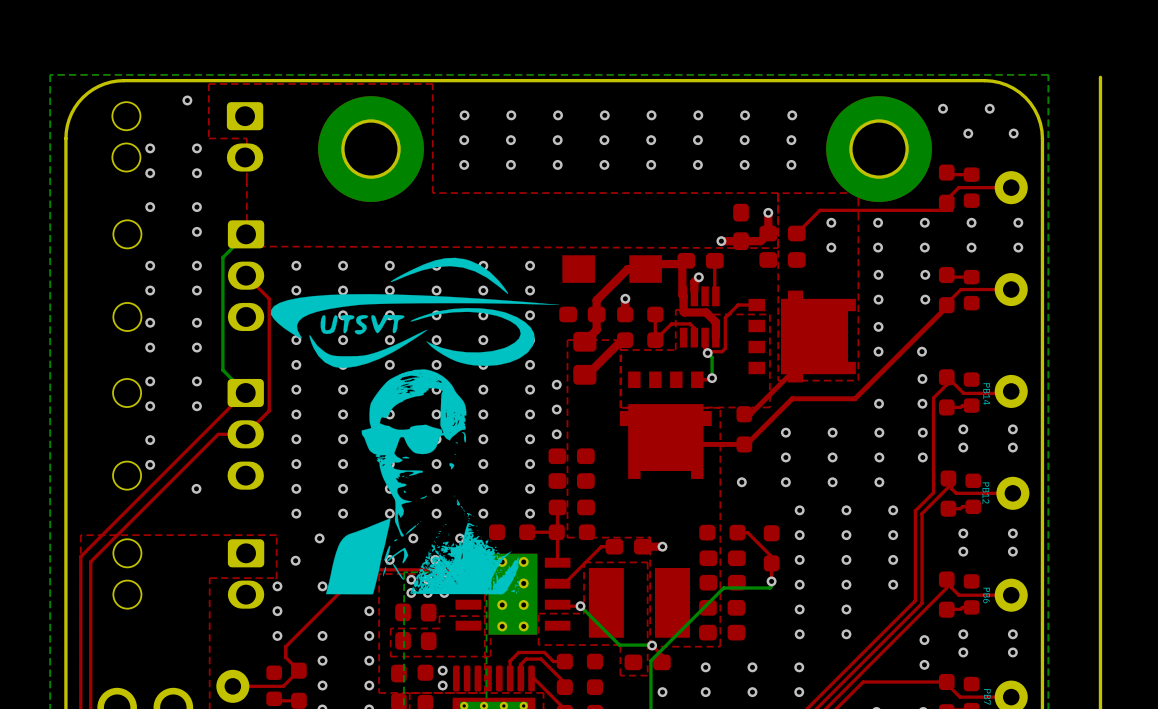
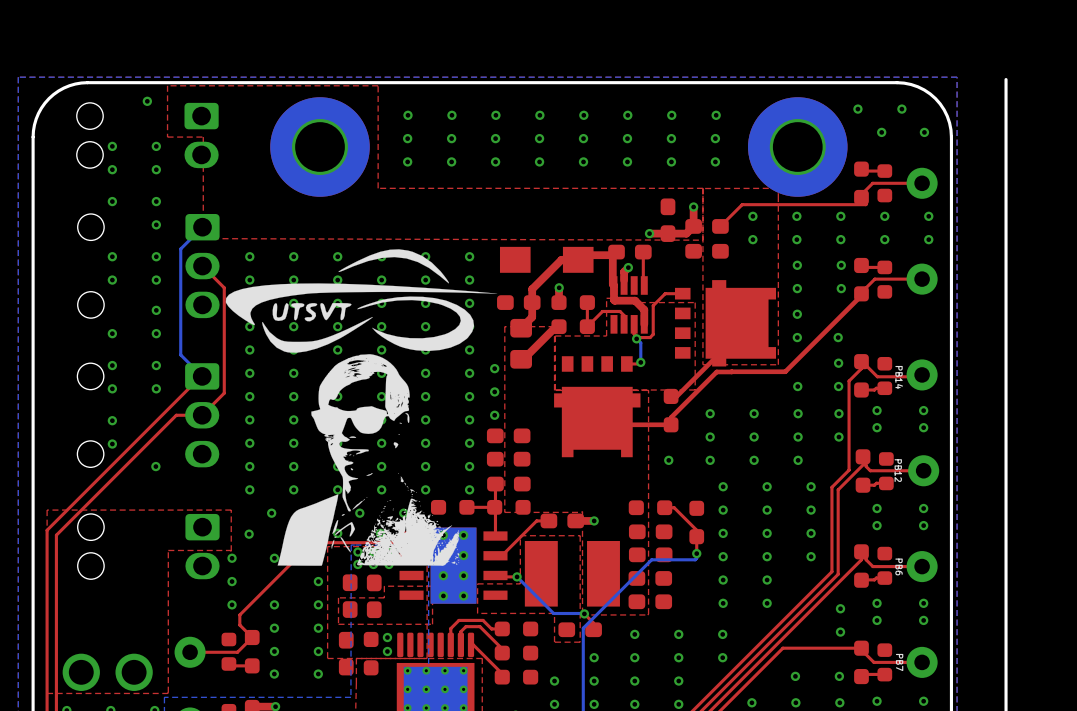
via: (150, 322) -> none
top track: (865, 388) (855, 398) (792, 398) (746, 444) (744, 444) -> (731, 371) (716, 371) (671, 417) (671, 424)
top track: none -> (785, 371) (731, 371)

